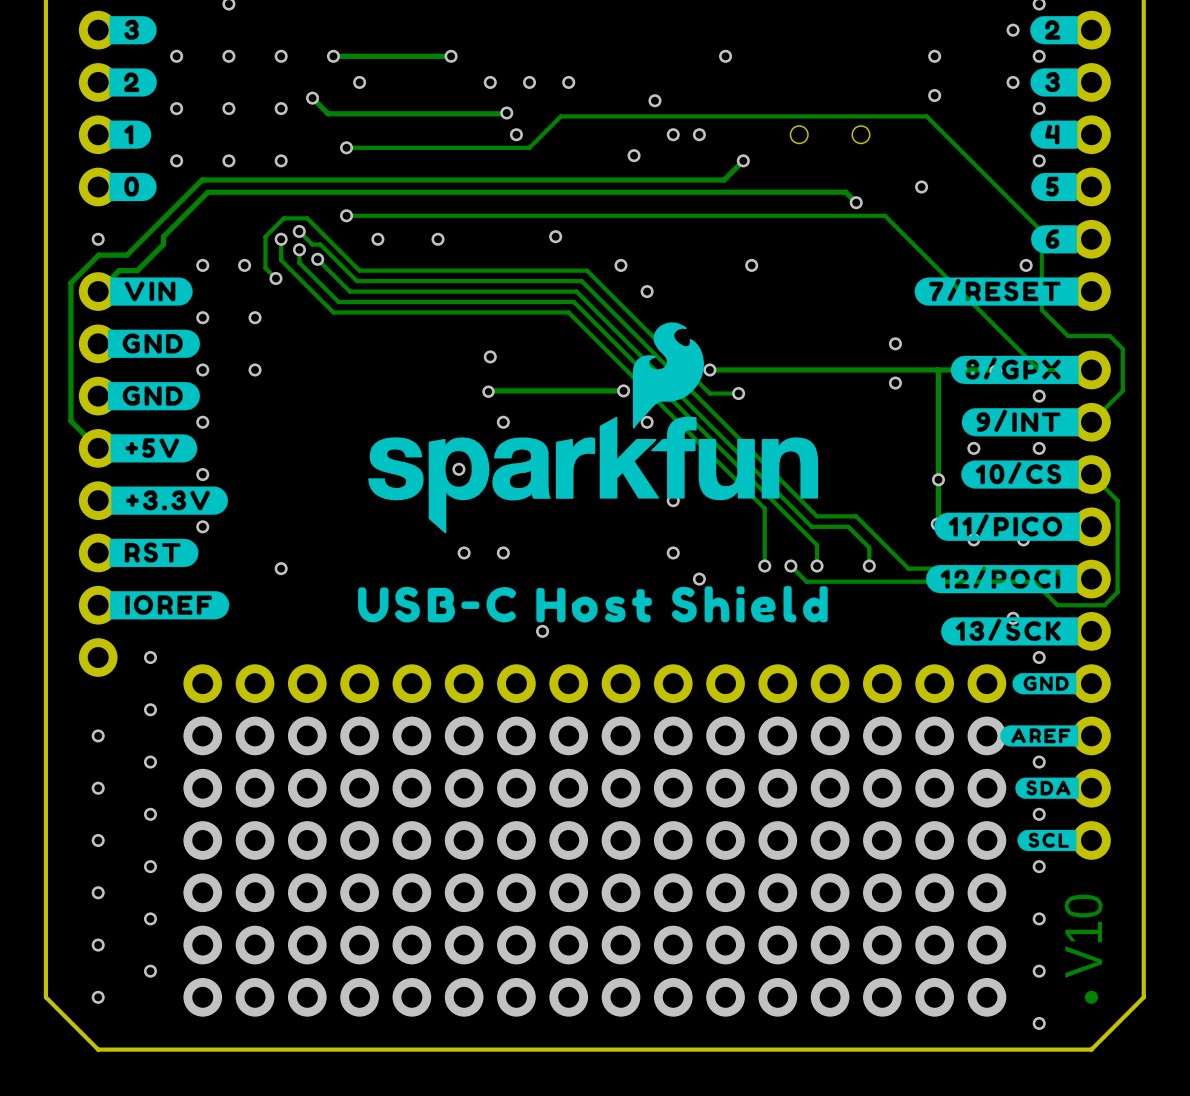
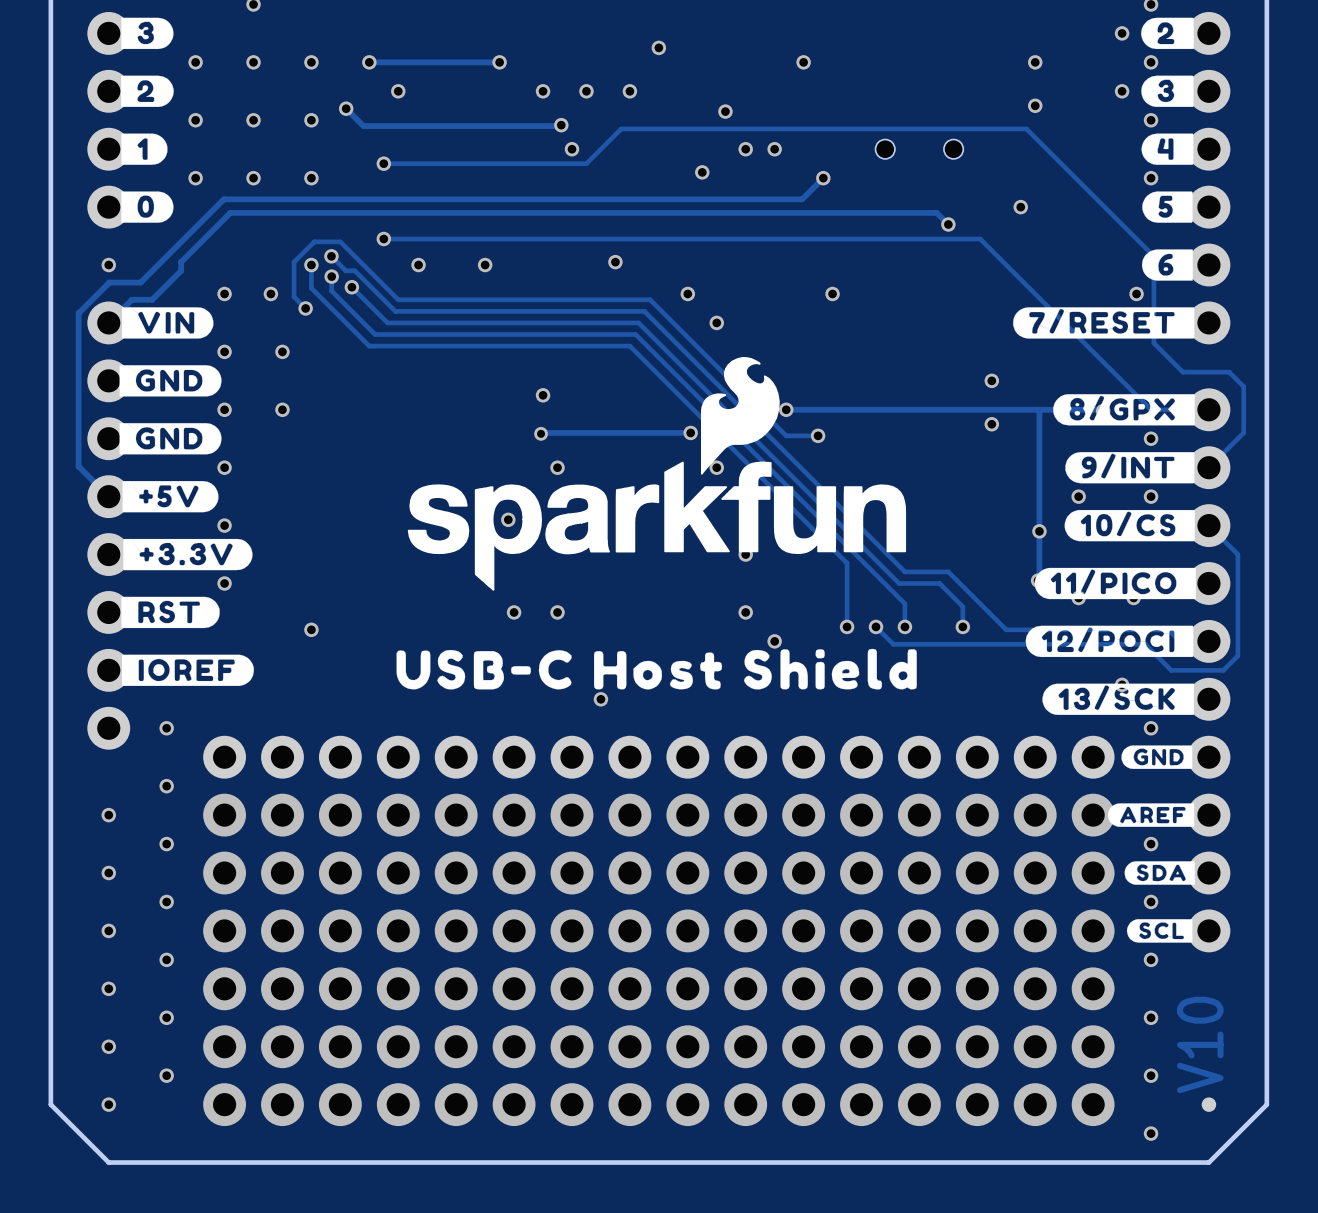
via: none -> (658, 47)

